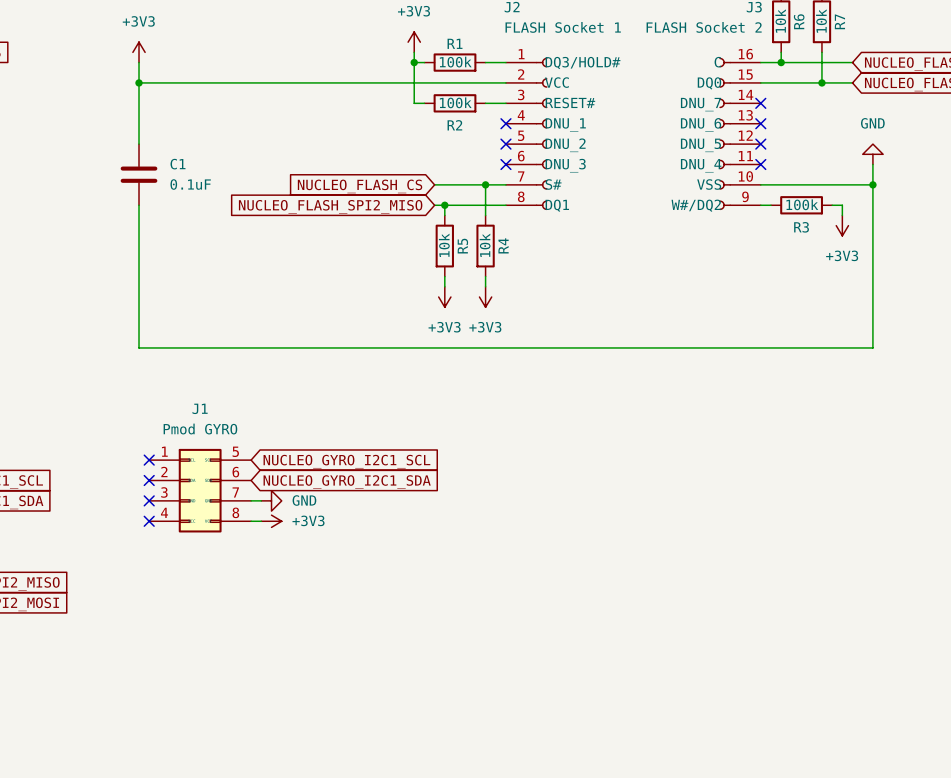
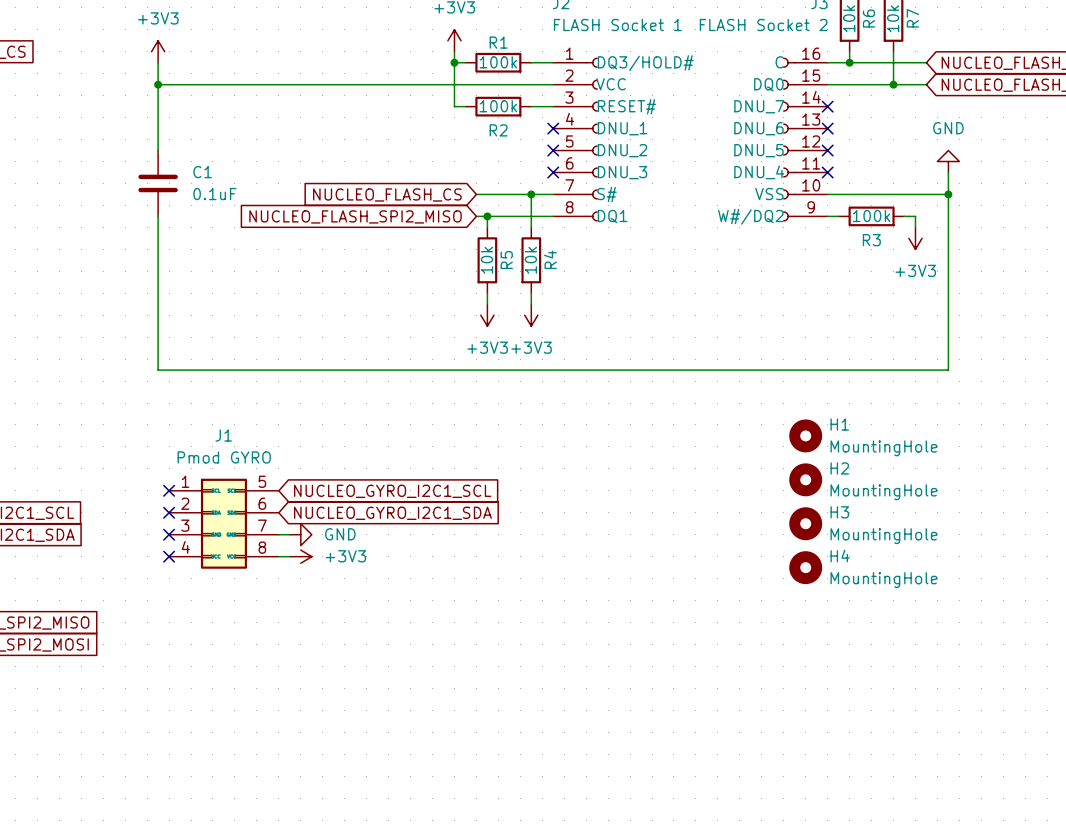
H1: none -> MountingHole (805, 435)
H2: none -> MountingHole (805, 479)
H3: none -> MountingHole (805, 523)
H4: none -> MountingHole (805, 567)

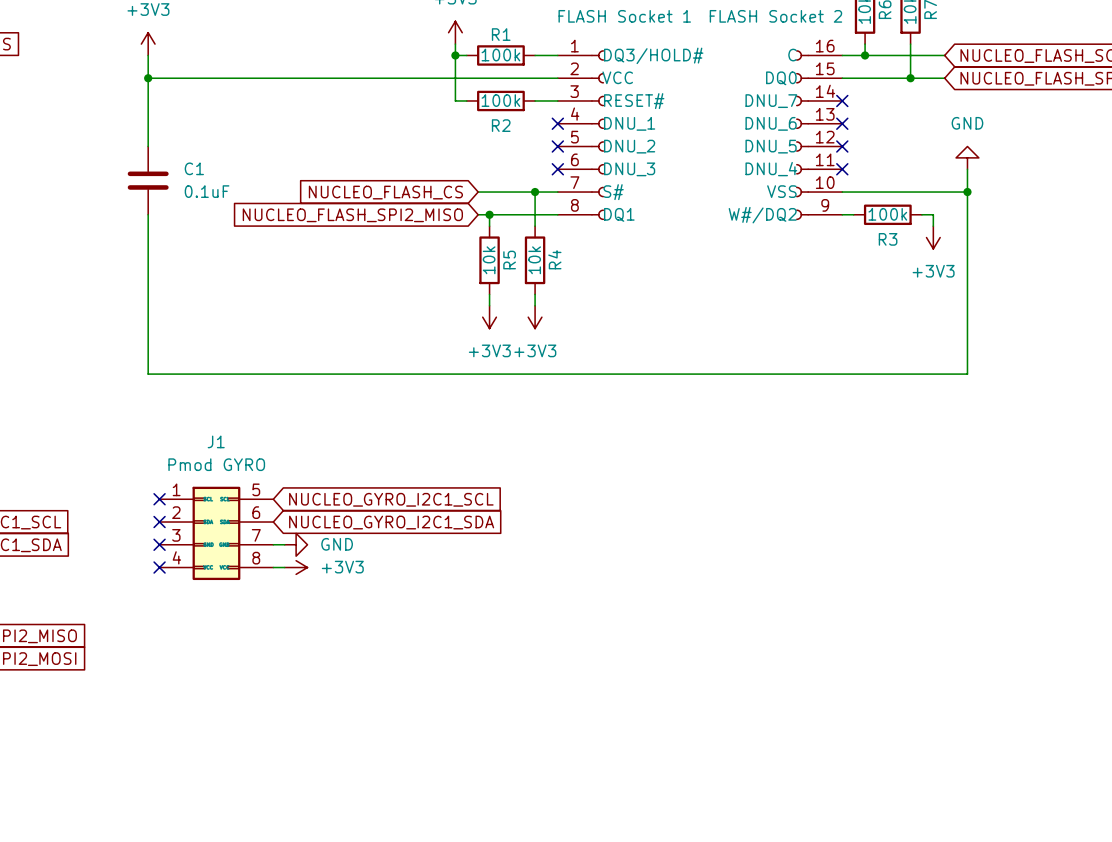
H1: MountingHole (805, 435) -> none
H2: MountingHole (805, 479) -> none
H3: MountingHole (805, 523) -> none
H4: MountingHole (805, 567) -> none

